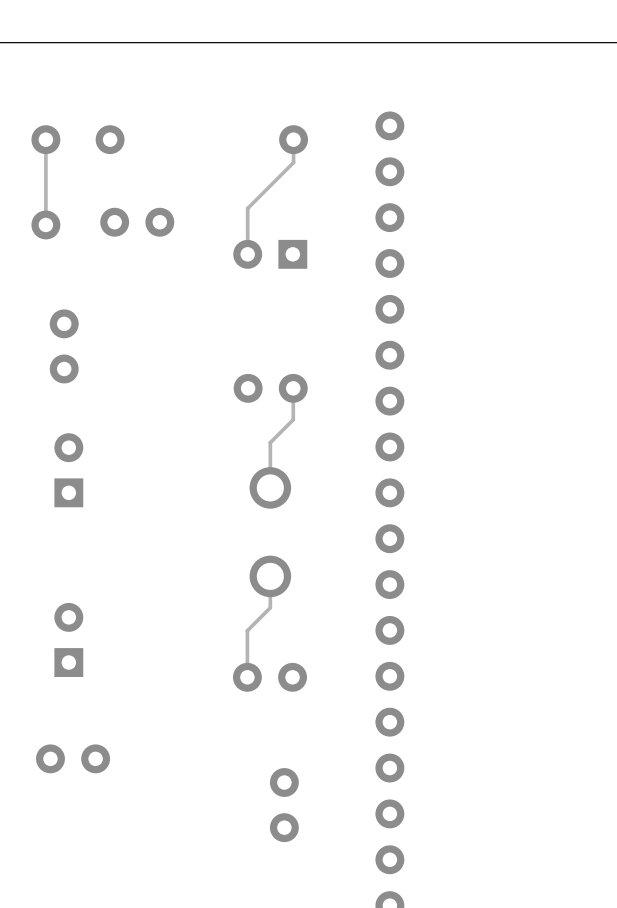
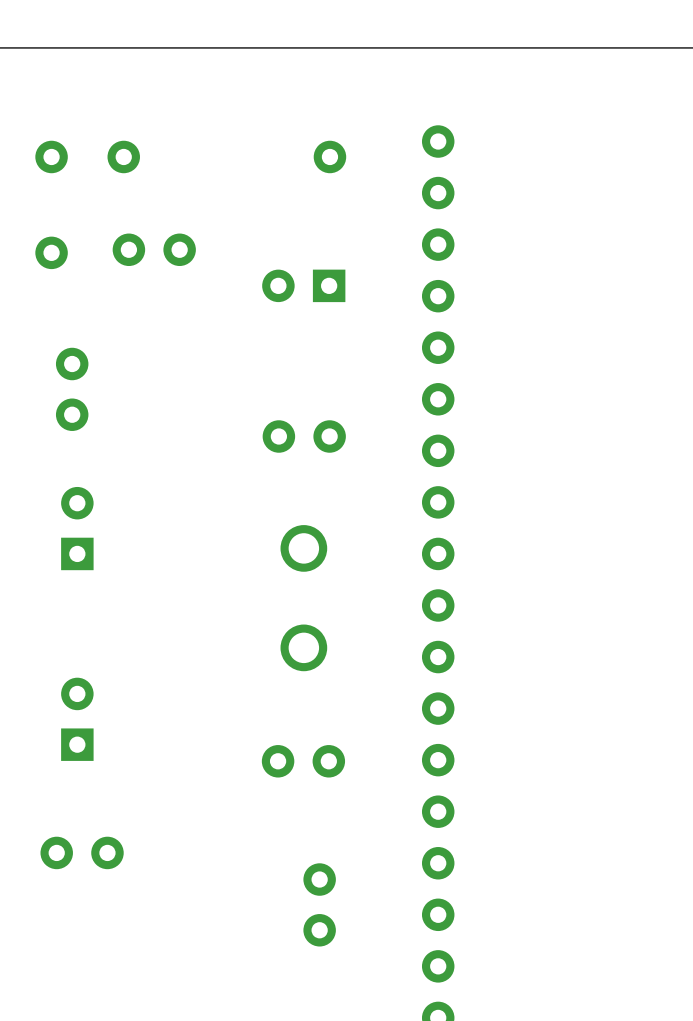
track: (45, 139) (45, 224) -> none
track: (293, 139) (293, 162) (247, 208) (247, 254) -> none
track: (293, 388) (293, 419) (270, 442) (270, 487) -> none
track: (270, 576) (270, 607) (247, 630) (247, 677) -> none

